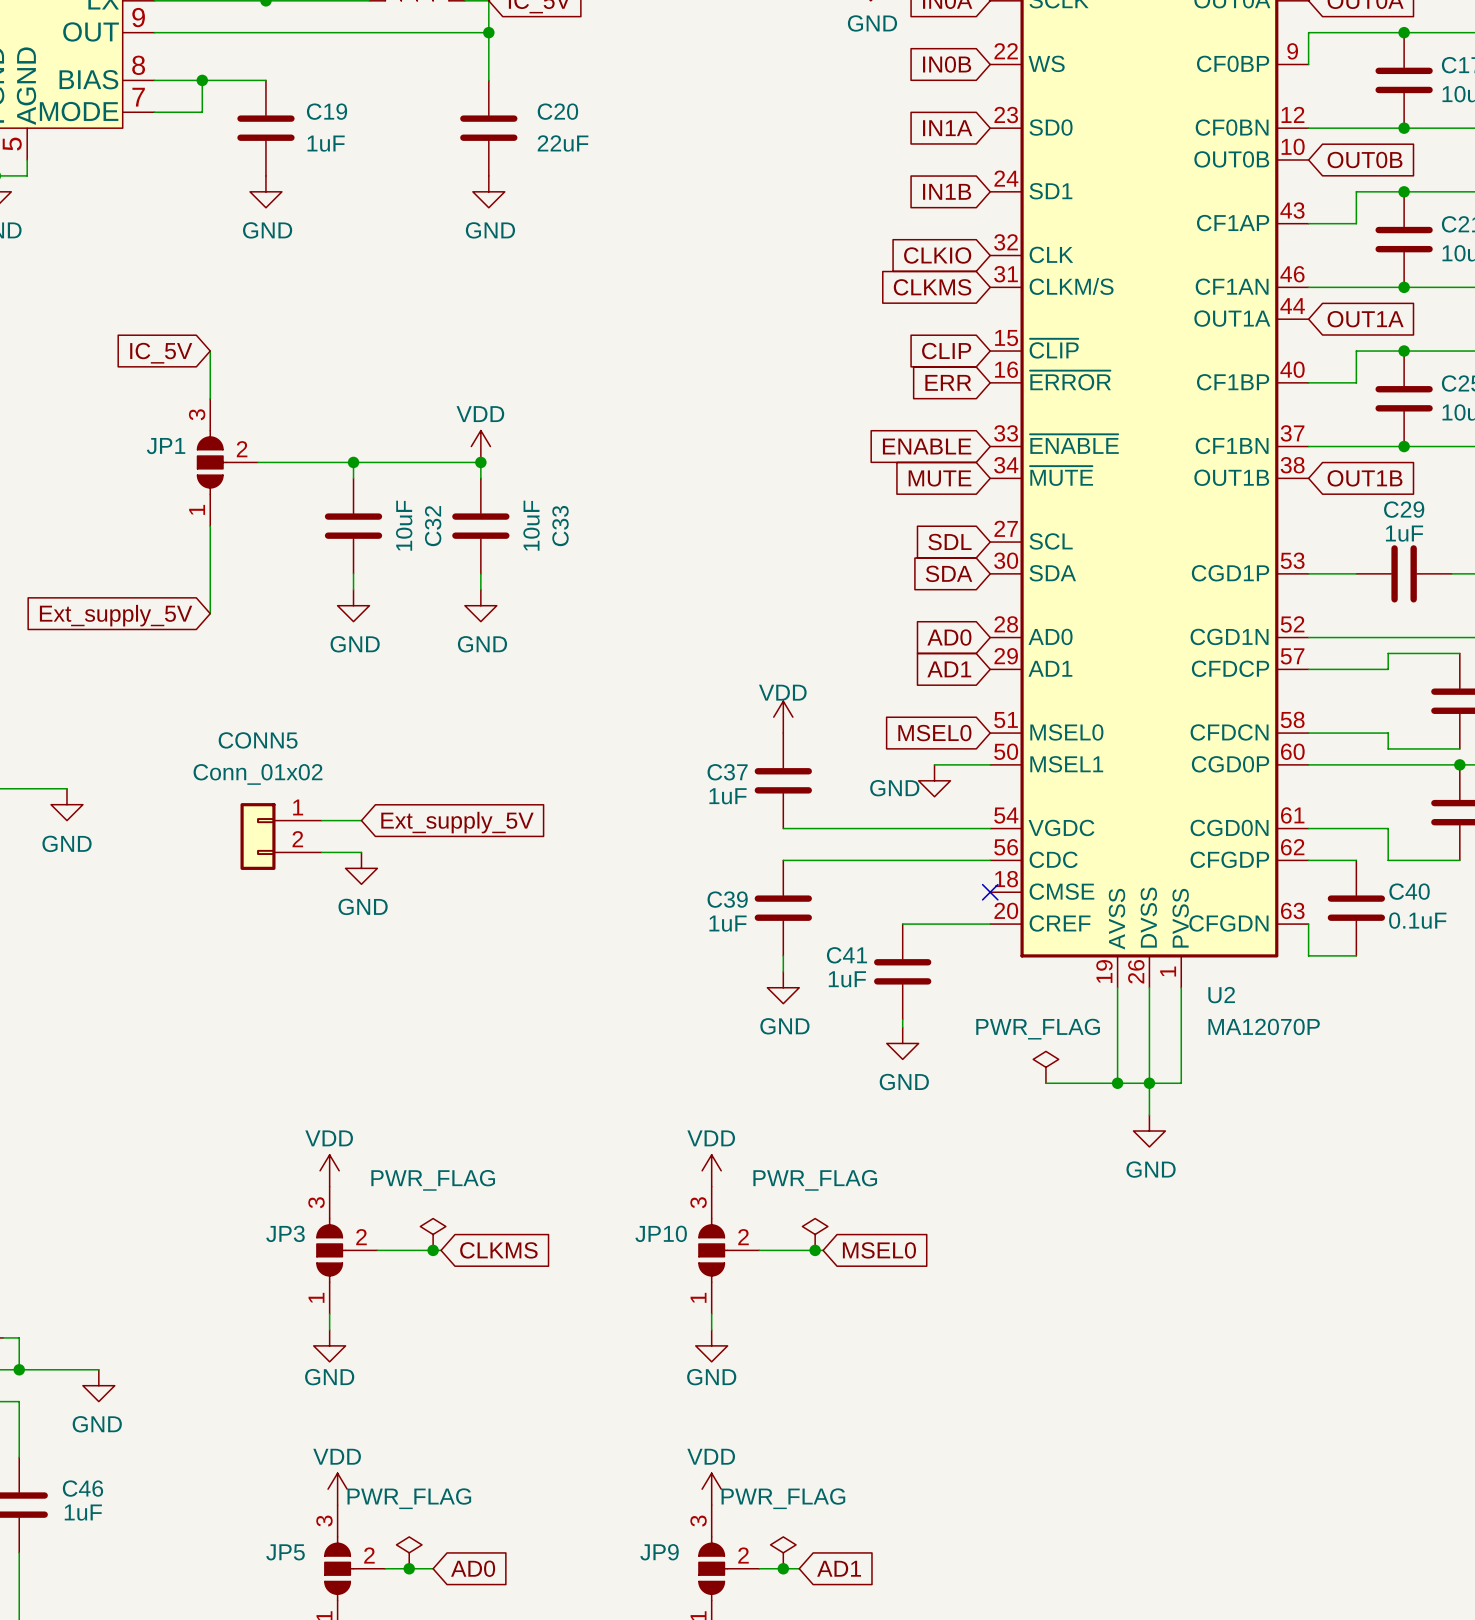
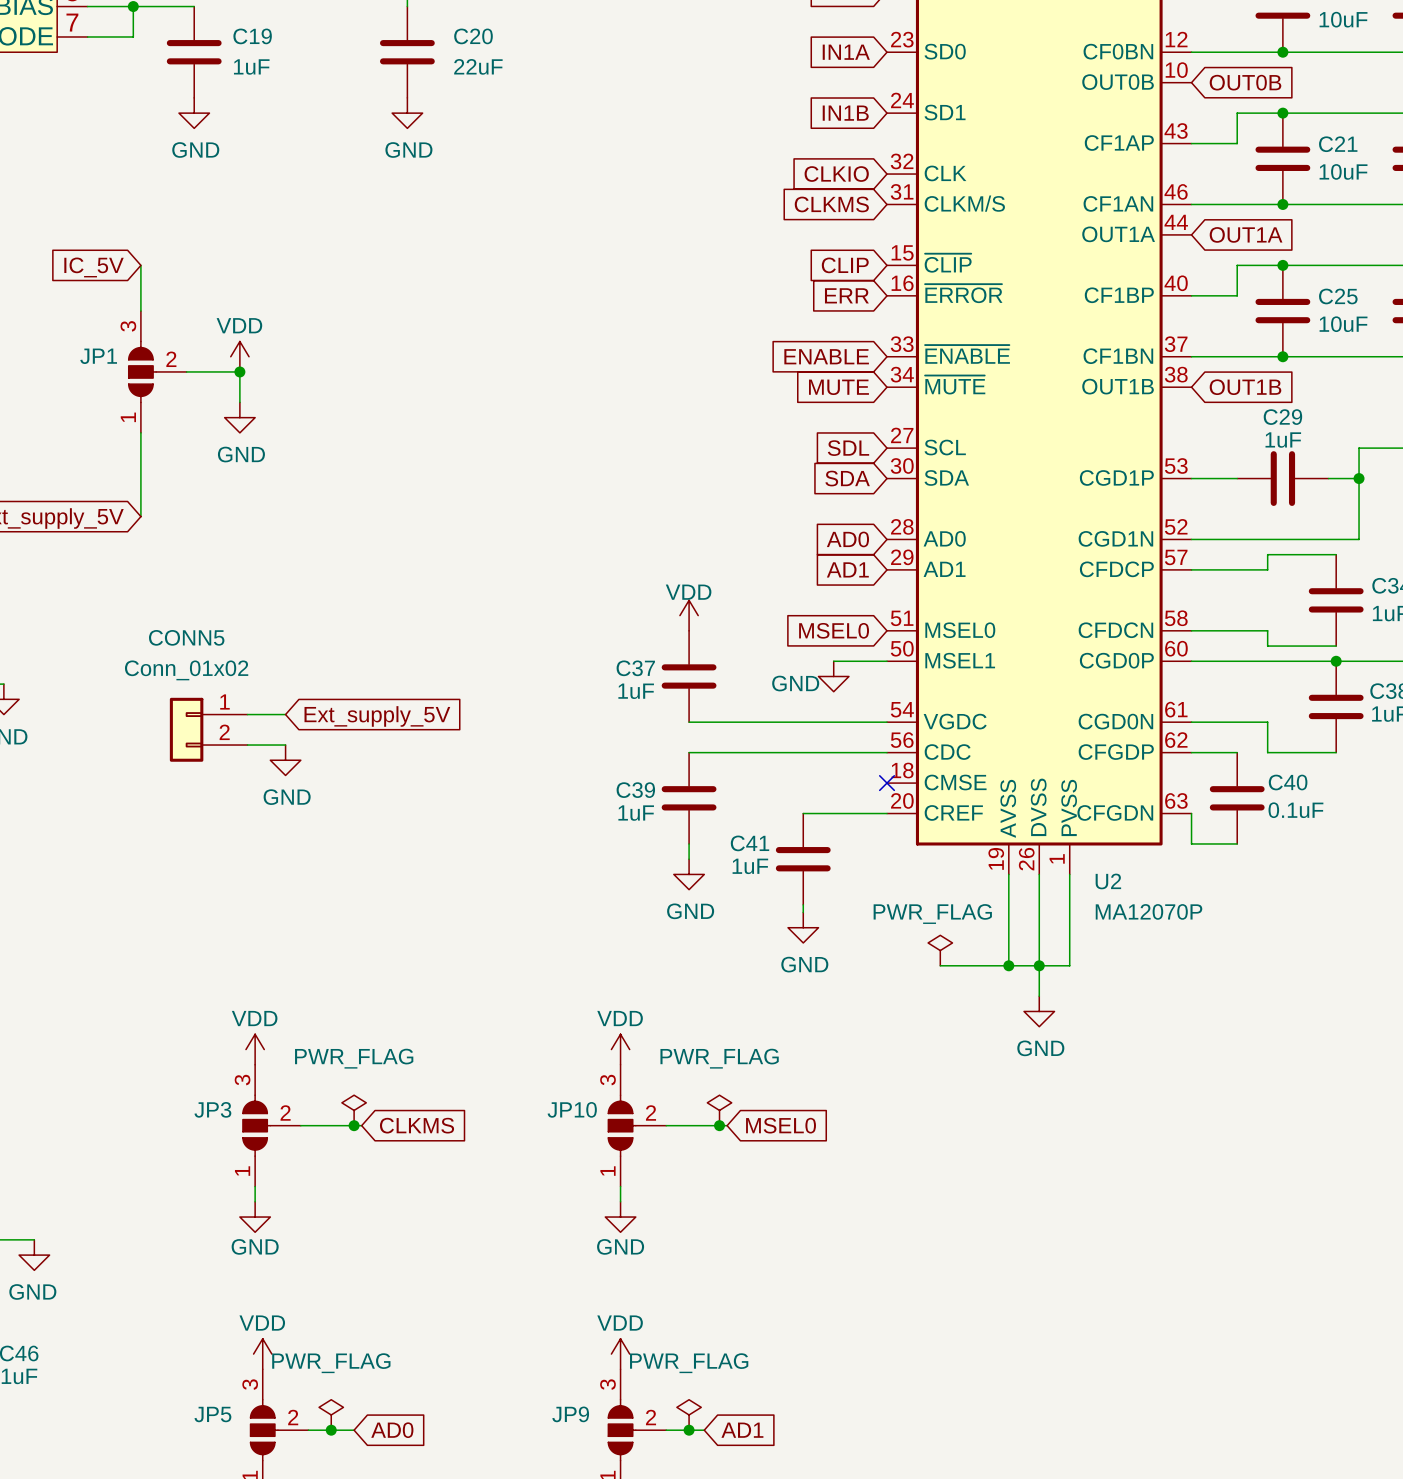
power symbol position: VDD (480, 446) -> VDD (239, 356)
wire: (313, 462) (480, 462) (480, 478) -> (239, 371) (239, 402)
wire: (353, 462) (353, 478) -> none
junction position: (353, 462) -> (239, 371)
junction: (480, 462) -> none
power symbol: none -> GND (239, 417)
C32: 10uF (353, 526) -> none
C33: 10uF (480, 526) -> none
wire: (353, 573) (353, 589) -> none
wire: (480, 573) (480, 589) -> none
power symbol: GND (353, 605) -> none
power symbol: GND (480, 605) -> none

